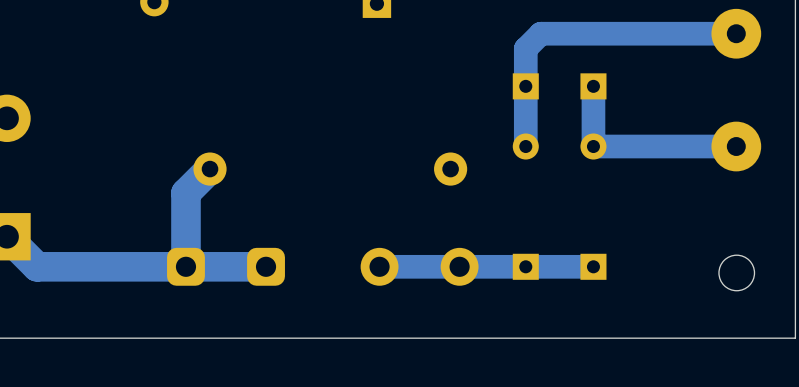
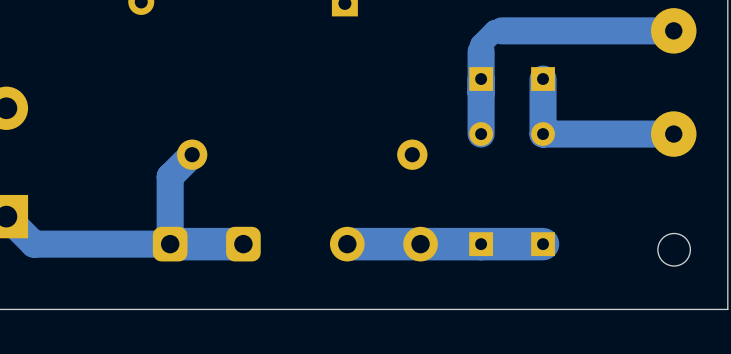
track width: thin (736, 33) (548, 33) -> thick (673, 30) (501, 30)
track width: thin (525, 56) (525, 146) -> thick (481, 51) (481, 134)
track width: thin (593, 86) (593, 146) (736, 146) -> thick (543, 79) (543, 134) (673, 134)
track width: thin (266, 266) (185, 266) -> thick (243, 244) (170, 244)
track width: thin (593, 266) (379, 266) -> thick (543, 244) (347, 244)

